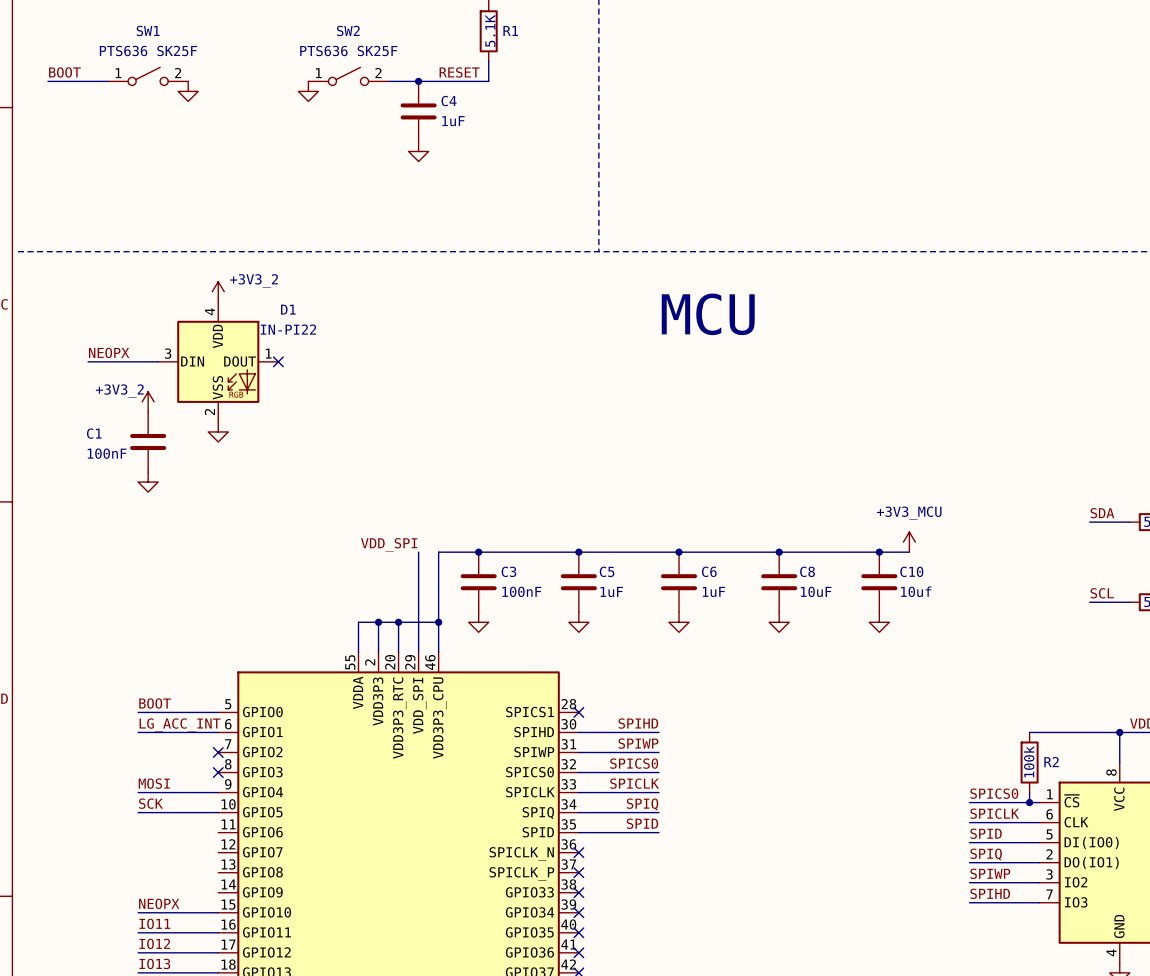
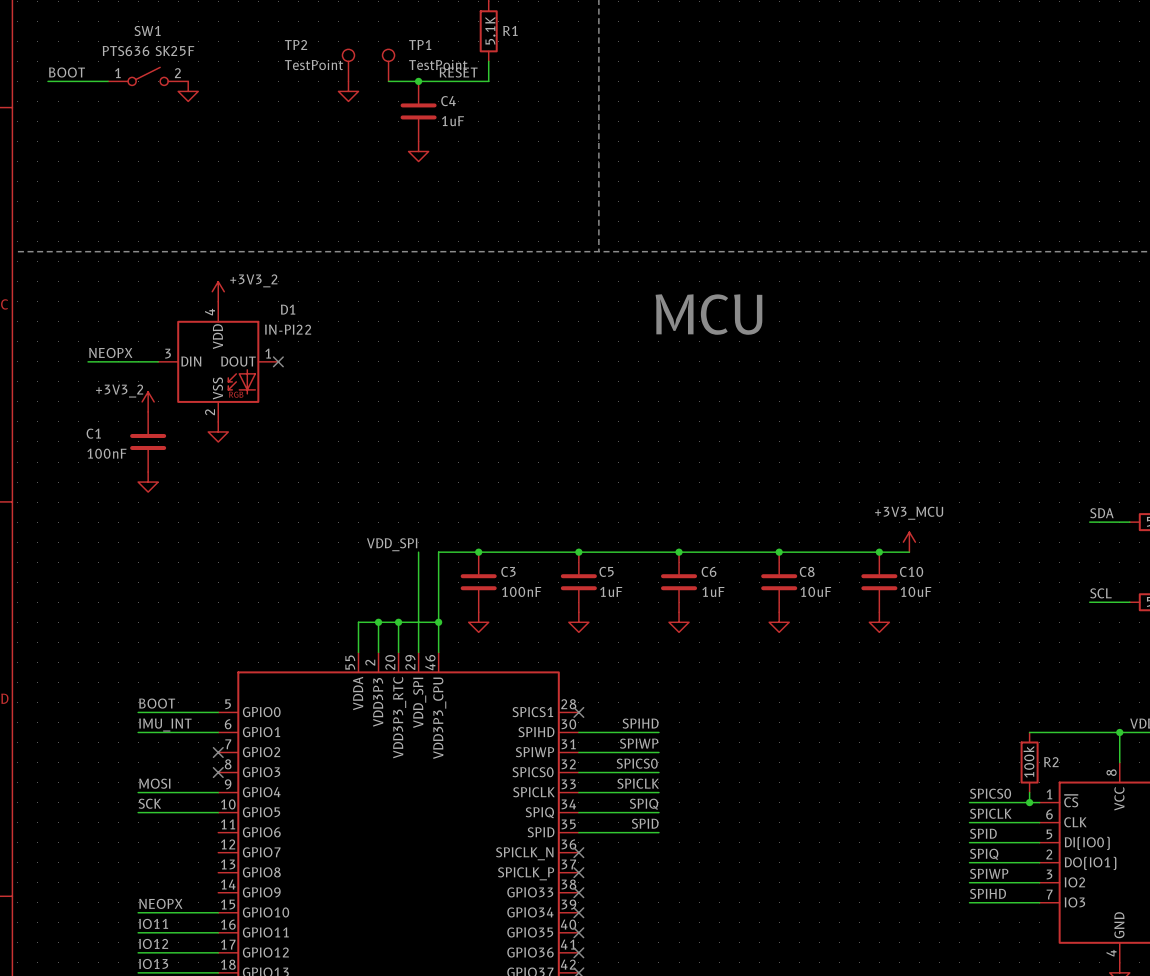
TP2: none -> TestPoint (348, 65)
TP1: none -> TestPoint (388, 65)
SW2: PTS636 SK25F (348, 76) -> none
power symbol position: (308, 91) -> (348, 91)
C10 value: 10uf (916, 591) -> 10uF (915, 591)
label: LG_ACC_INT (180, 725) -> IMU_INT (165, 725)

